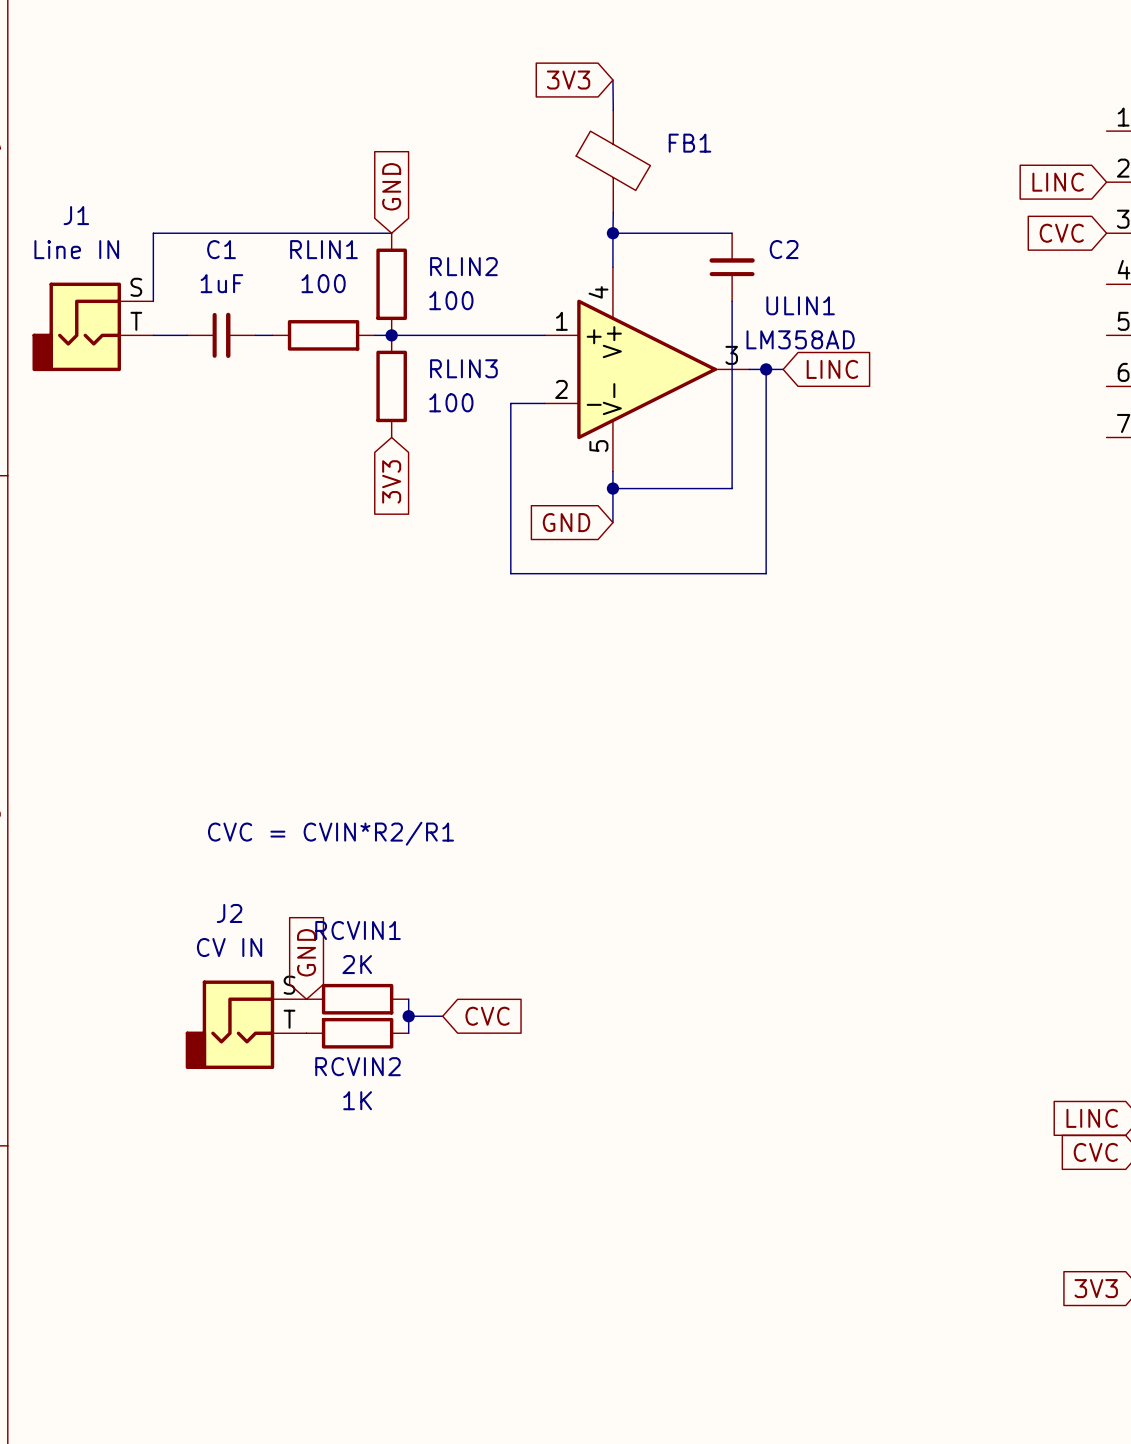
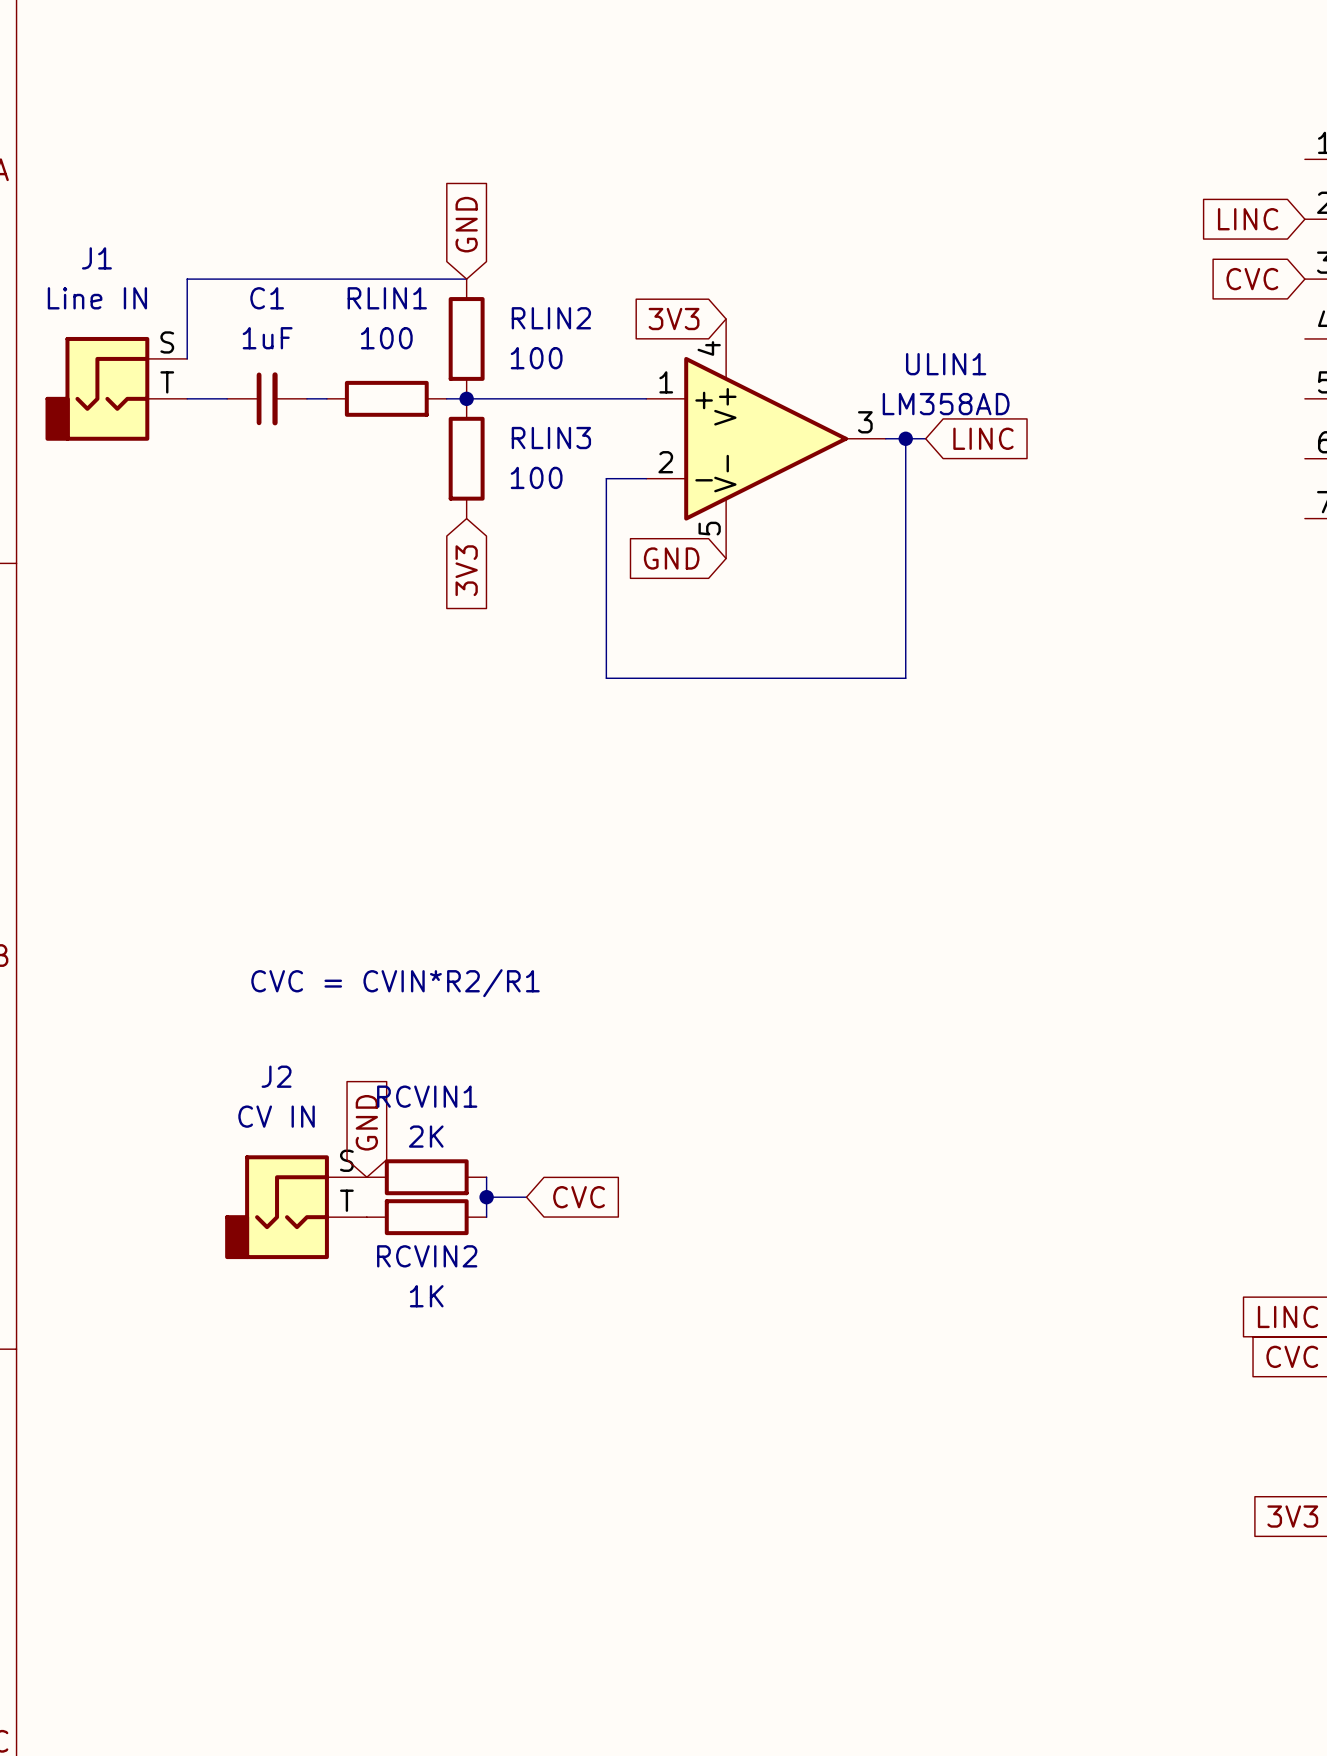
global label position: 3V3 (568, 80) -> 3V3 (674, 319)
wire: (612, 80) (613, 110) -> none
FB1: (613, 161) -> none
wire: (613, 212) (612, 233) -> none
wire: (612, 233) (612, 267) -> none
wire: (612, 233) (732, 233) -> none
junction: (612, 233) -> none
C2: (732, 267) -> none
wire: (732, 301) (732, 488) (612, 488) -> none
wire: (612, 471) (612, 522) -> none
junction: (612, 488) -> none
global label position: GND (566, 522) -> GND (671, 558)

